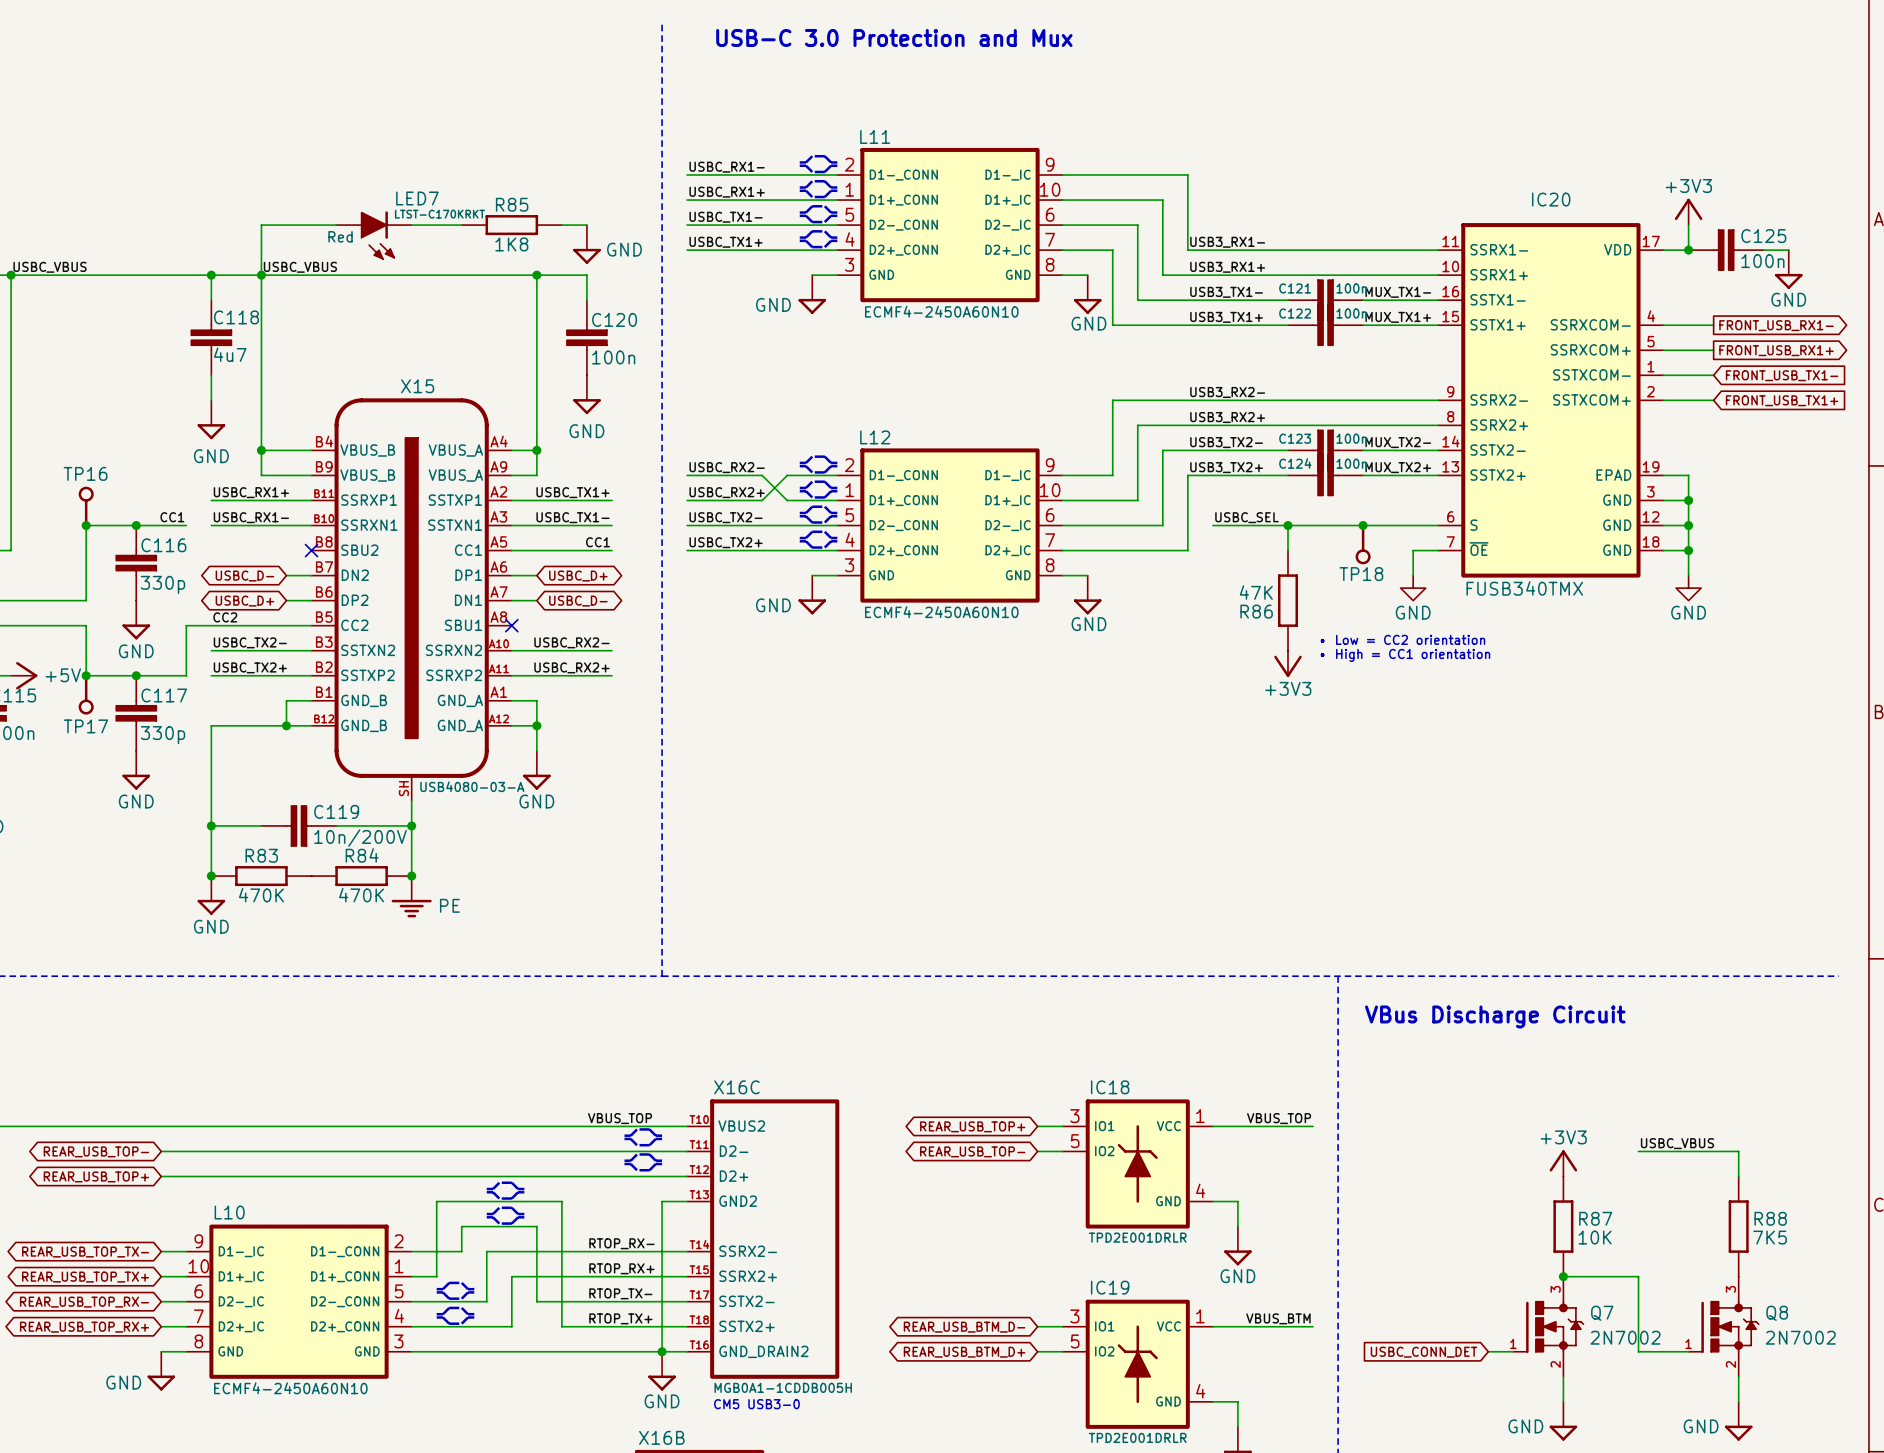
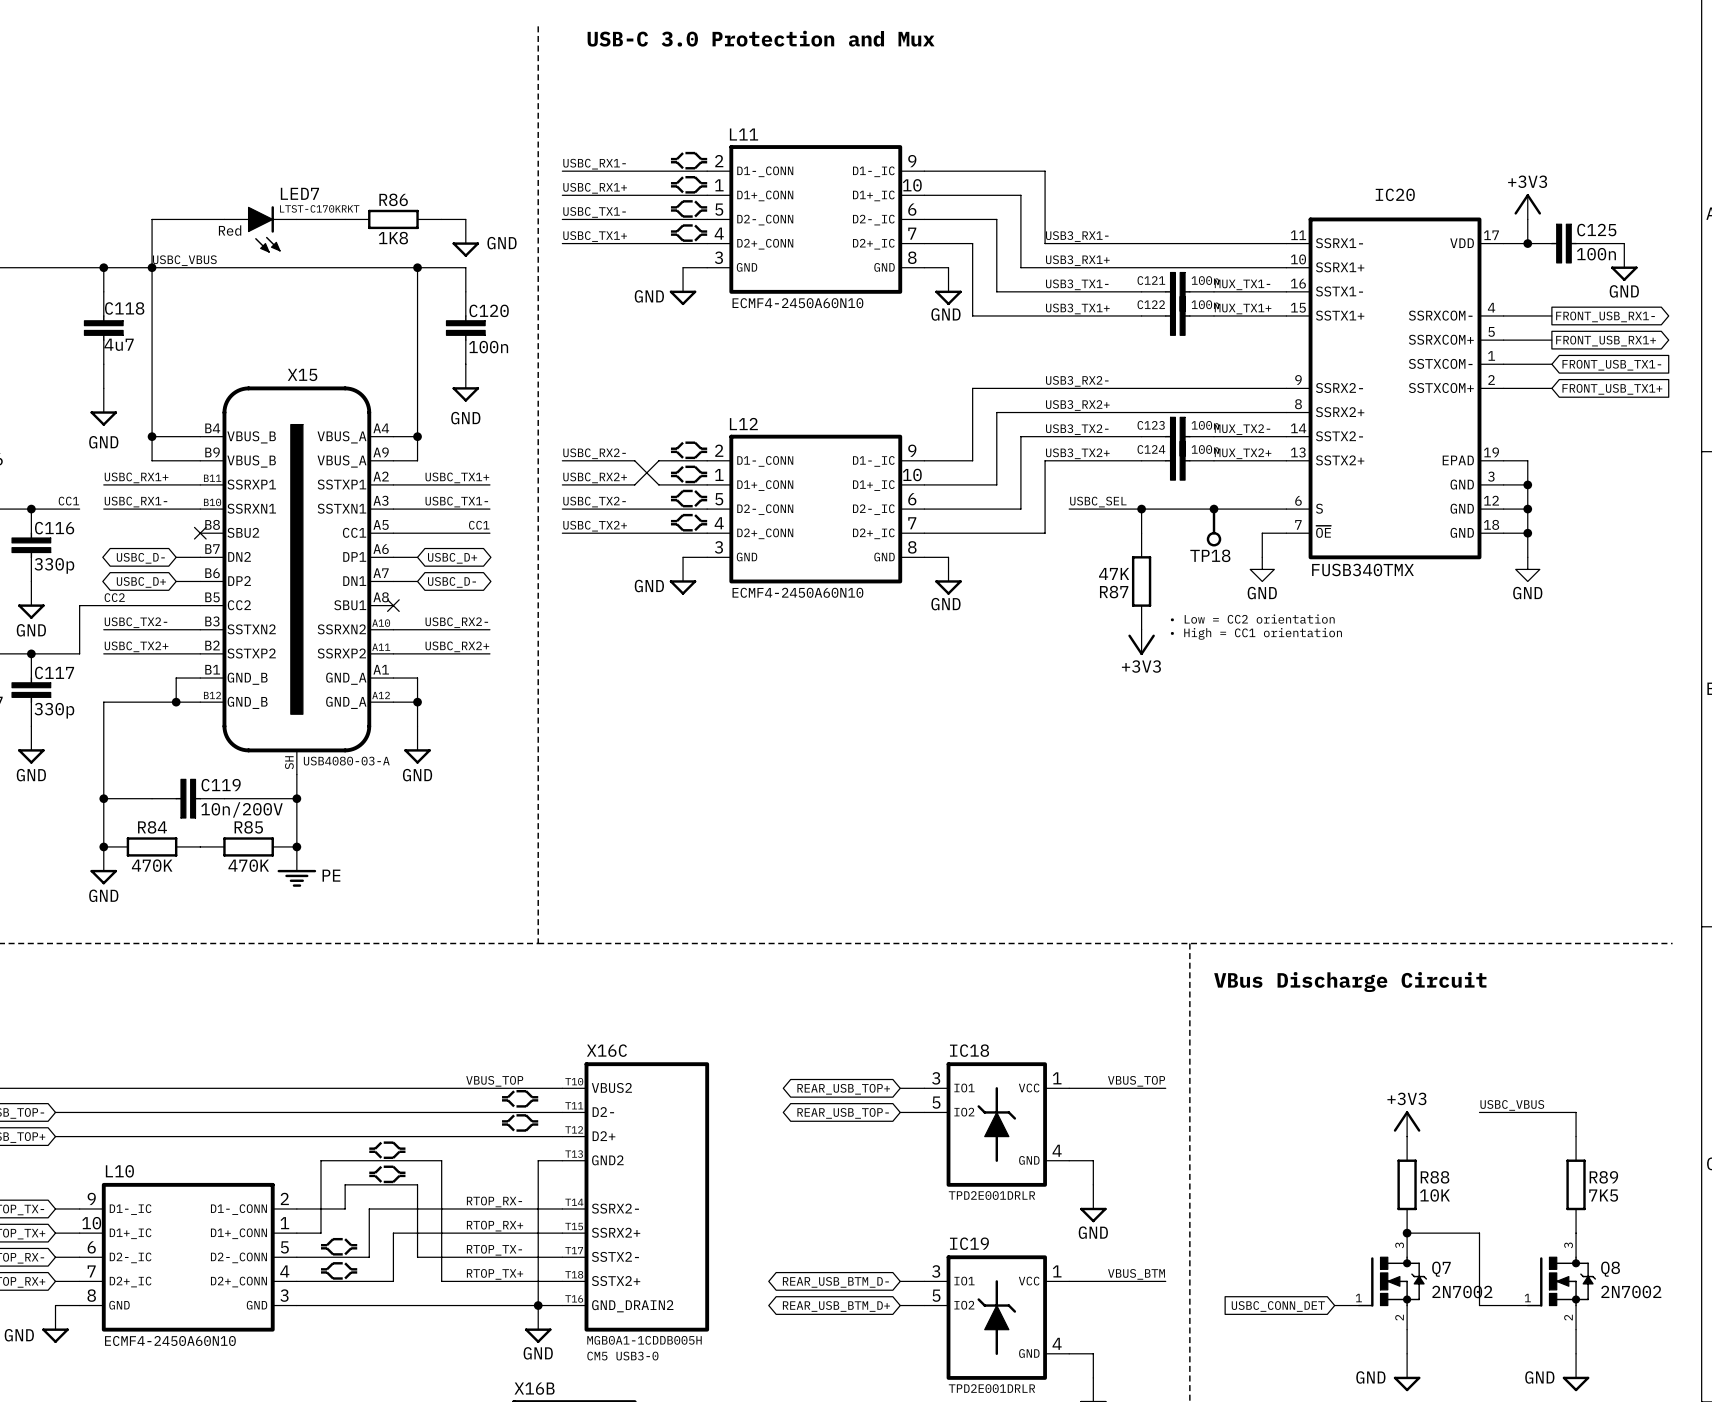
R85 name: R85 (512, 204) -> R86 (393, 199)
R86 name: R86 (1256, 611) -> R87 (1114, 592)
R83 name: R83 (261, 855) -> R84 (152, 827)
R84 name: R84 (362, 855) -> R85 (248, 827)
R87 name: R87 (1595, 1218) -> R88 (1435, 1177)
R88 name: R88 (1770, 1218) -> R89 (1603, 1177)

